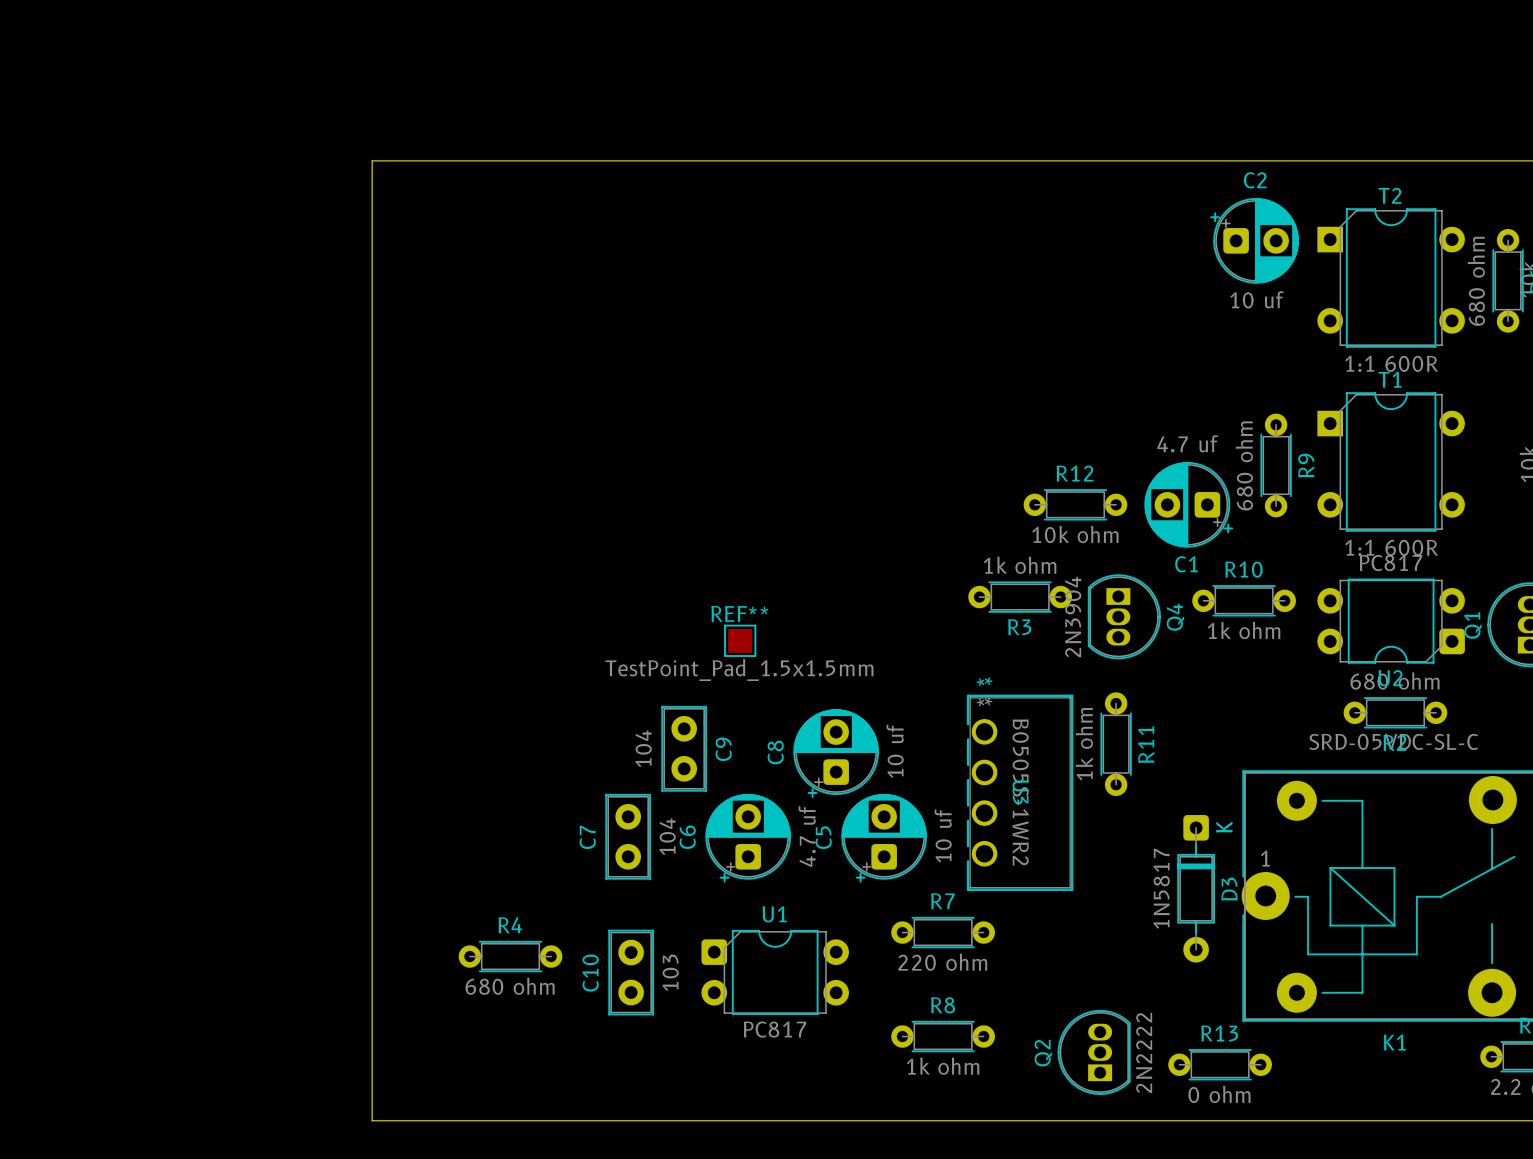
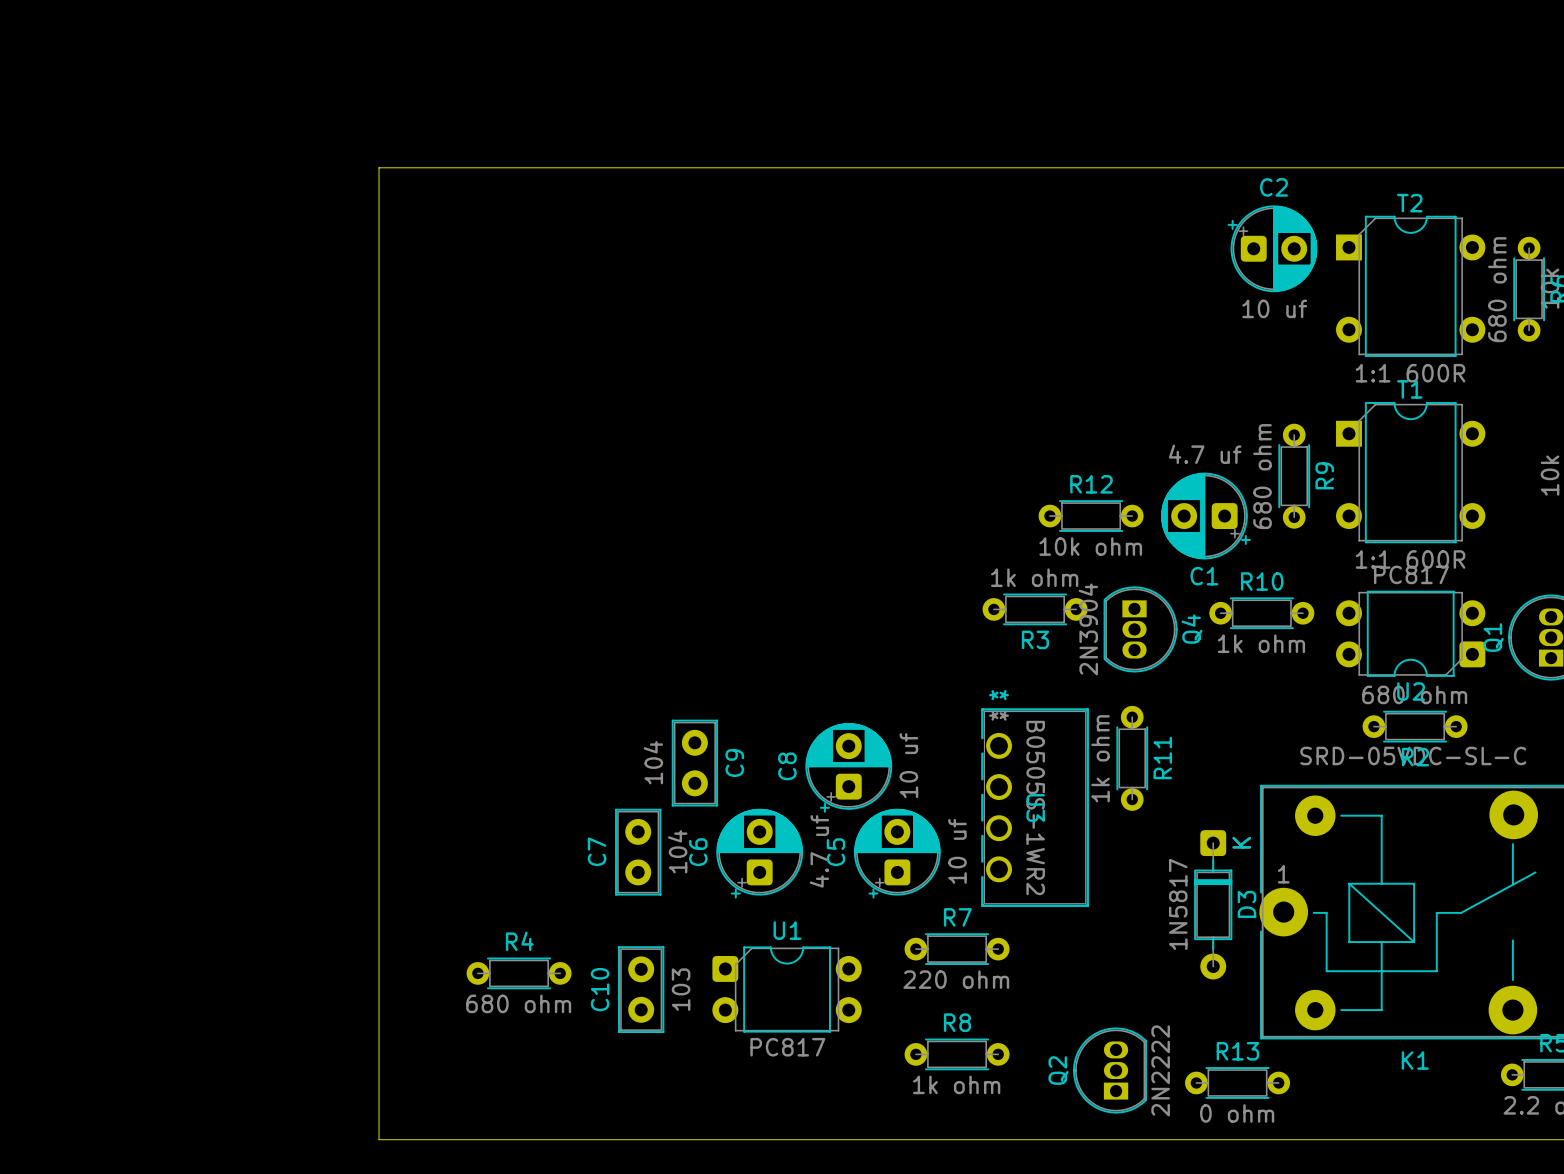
REF**: TestPoint_Pad_1.5x1.5mm (740, 640) -> none

